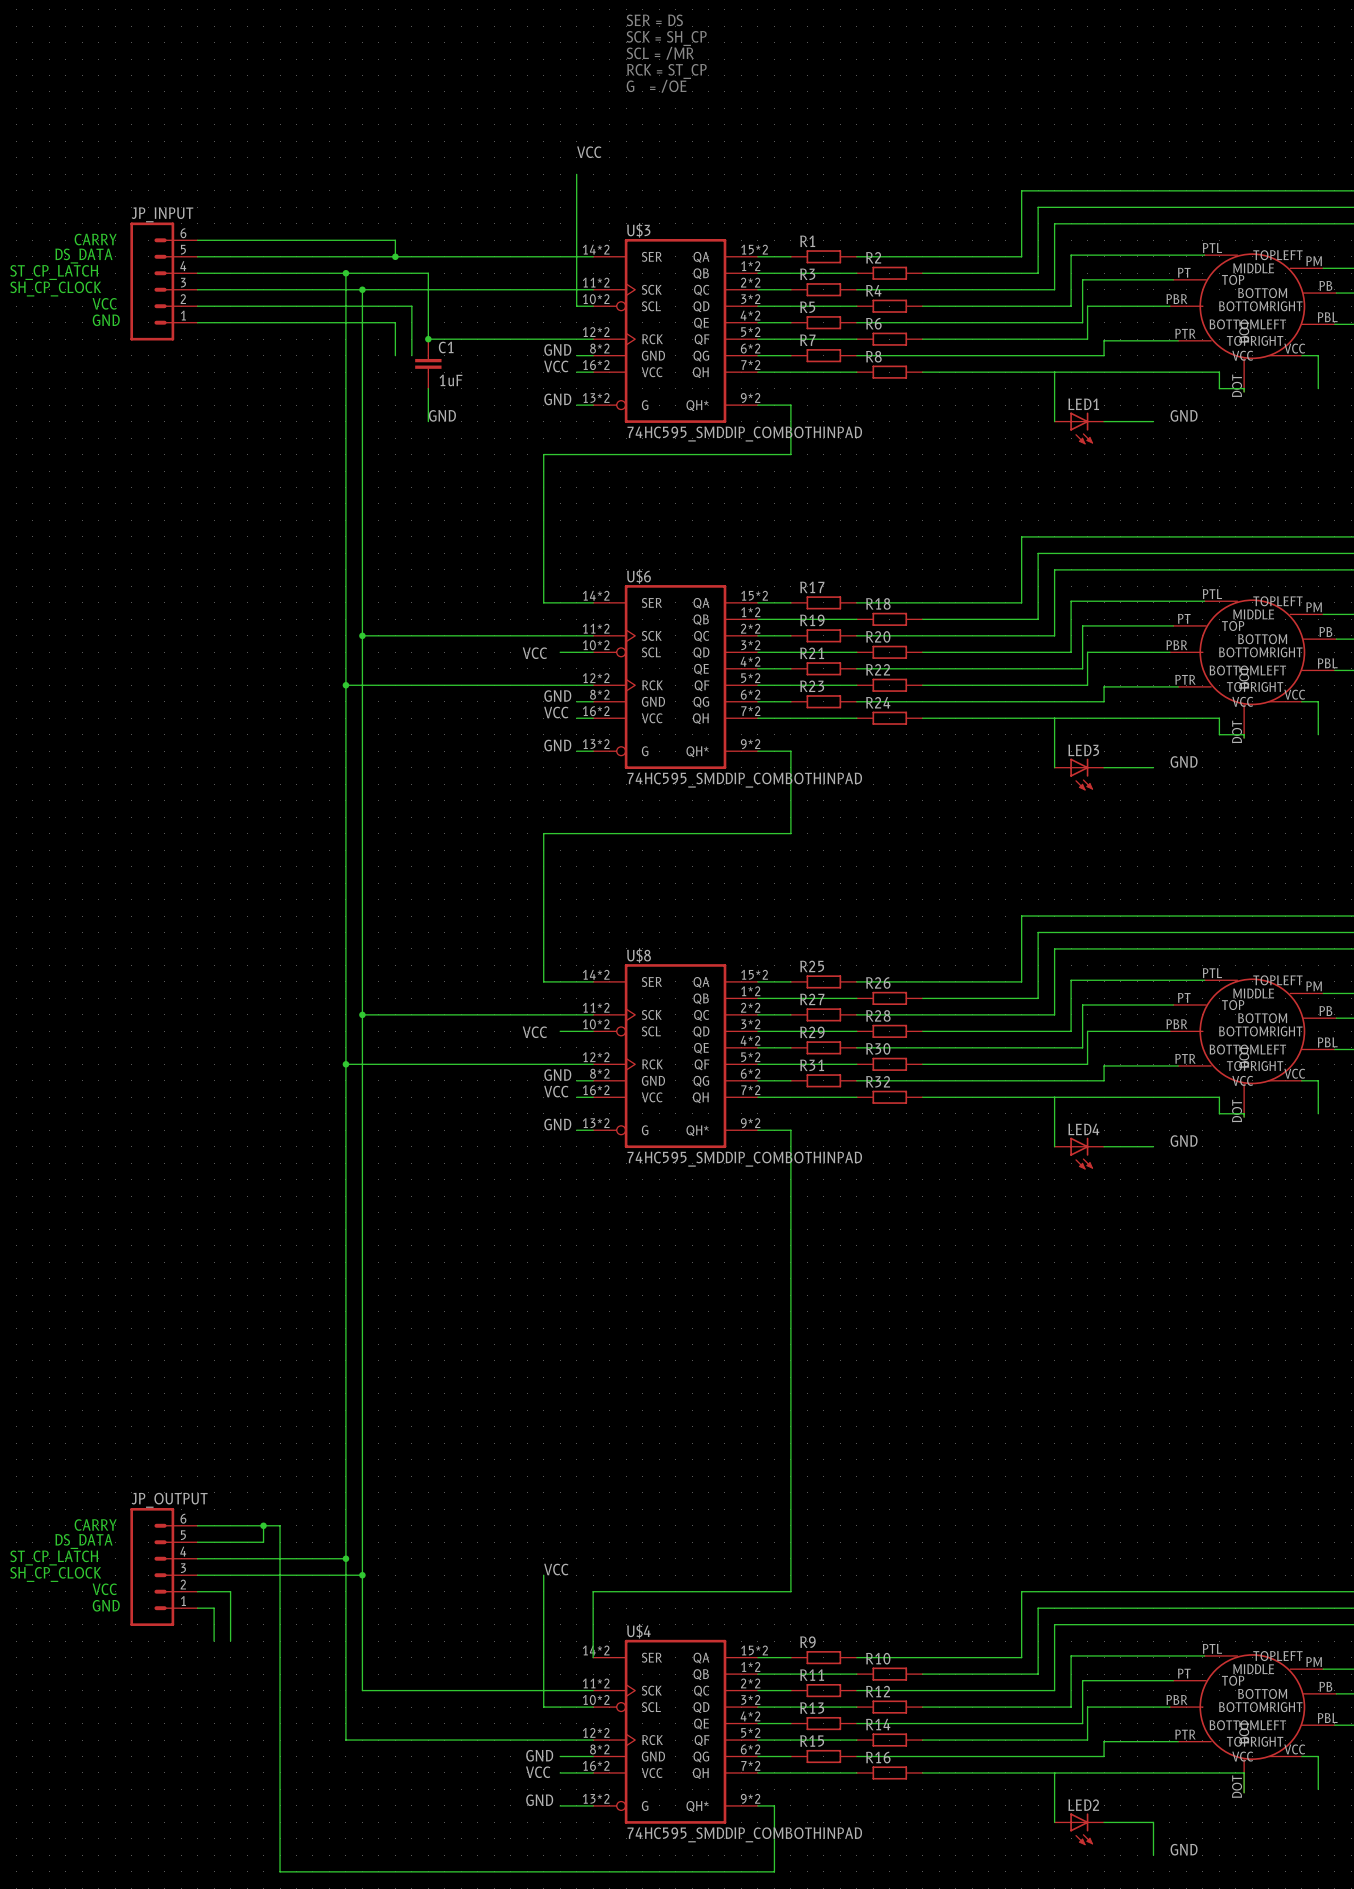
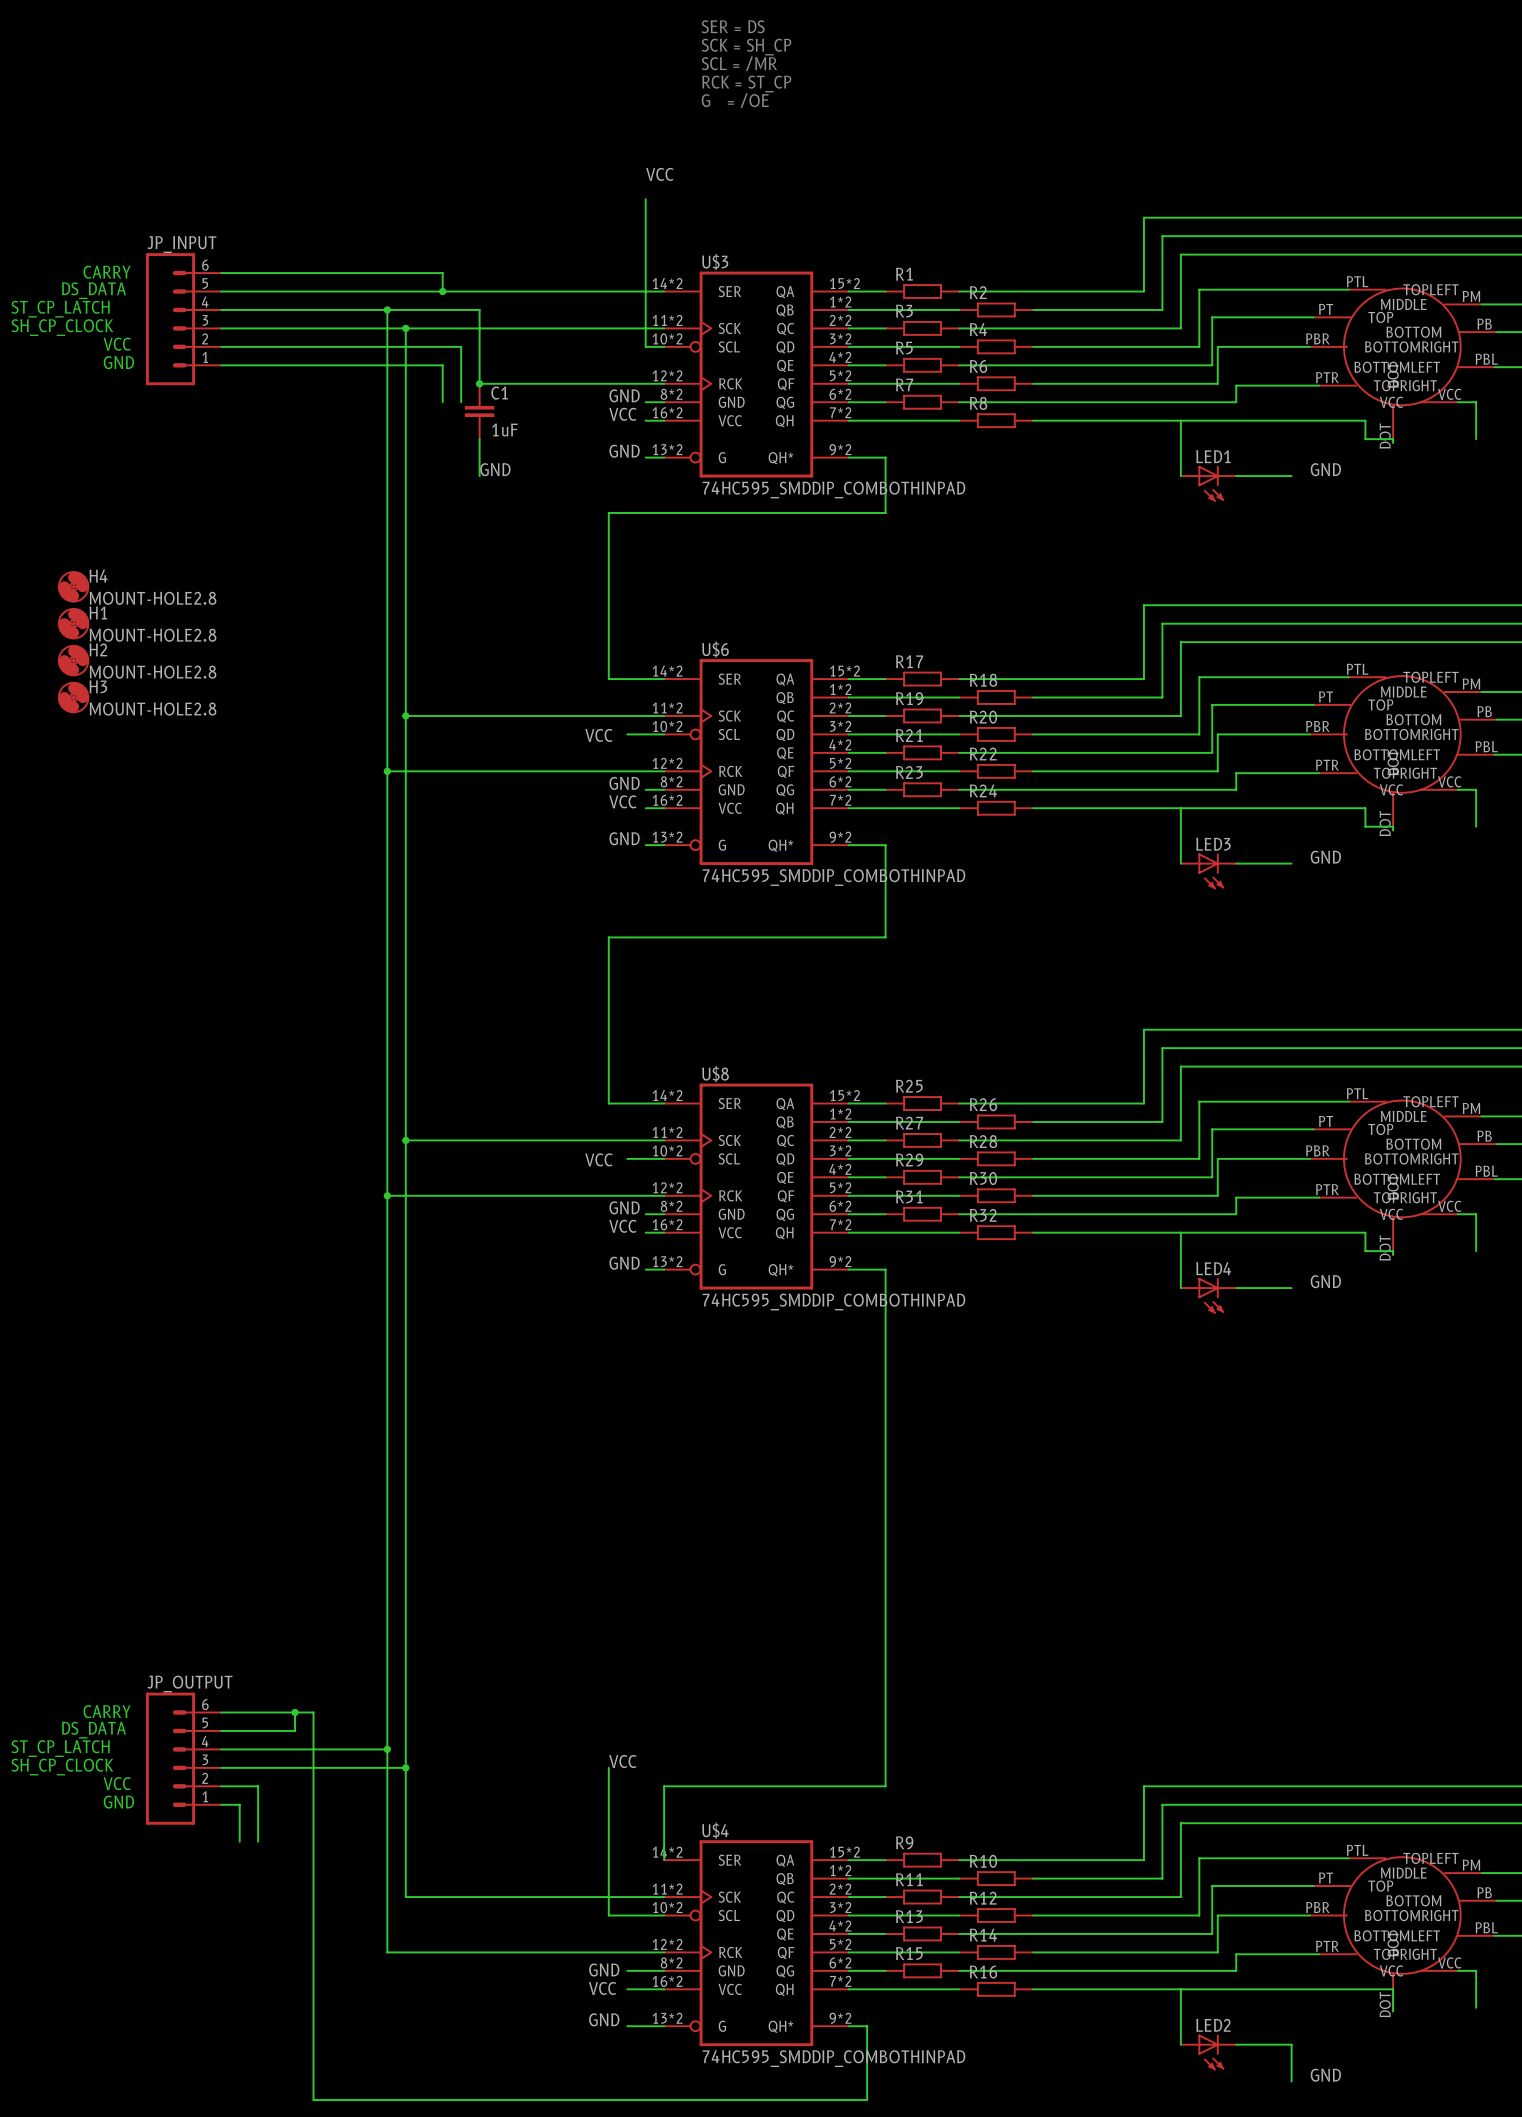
H4: none -> MOUNT-HOLE2.8 (73, 586)
H1: none -> MOUNT-HOLE2.8 (73, 623)
H2: none -> MOUNT-HOLE2.8 (73, 660)
H3: none -> MOUNT-HOLE2.8 (73, 697)

